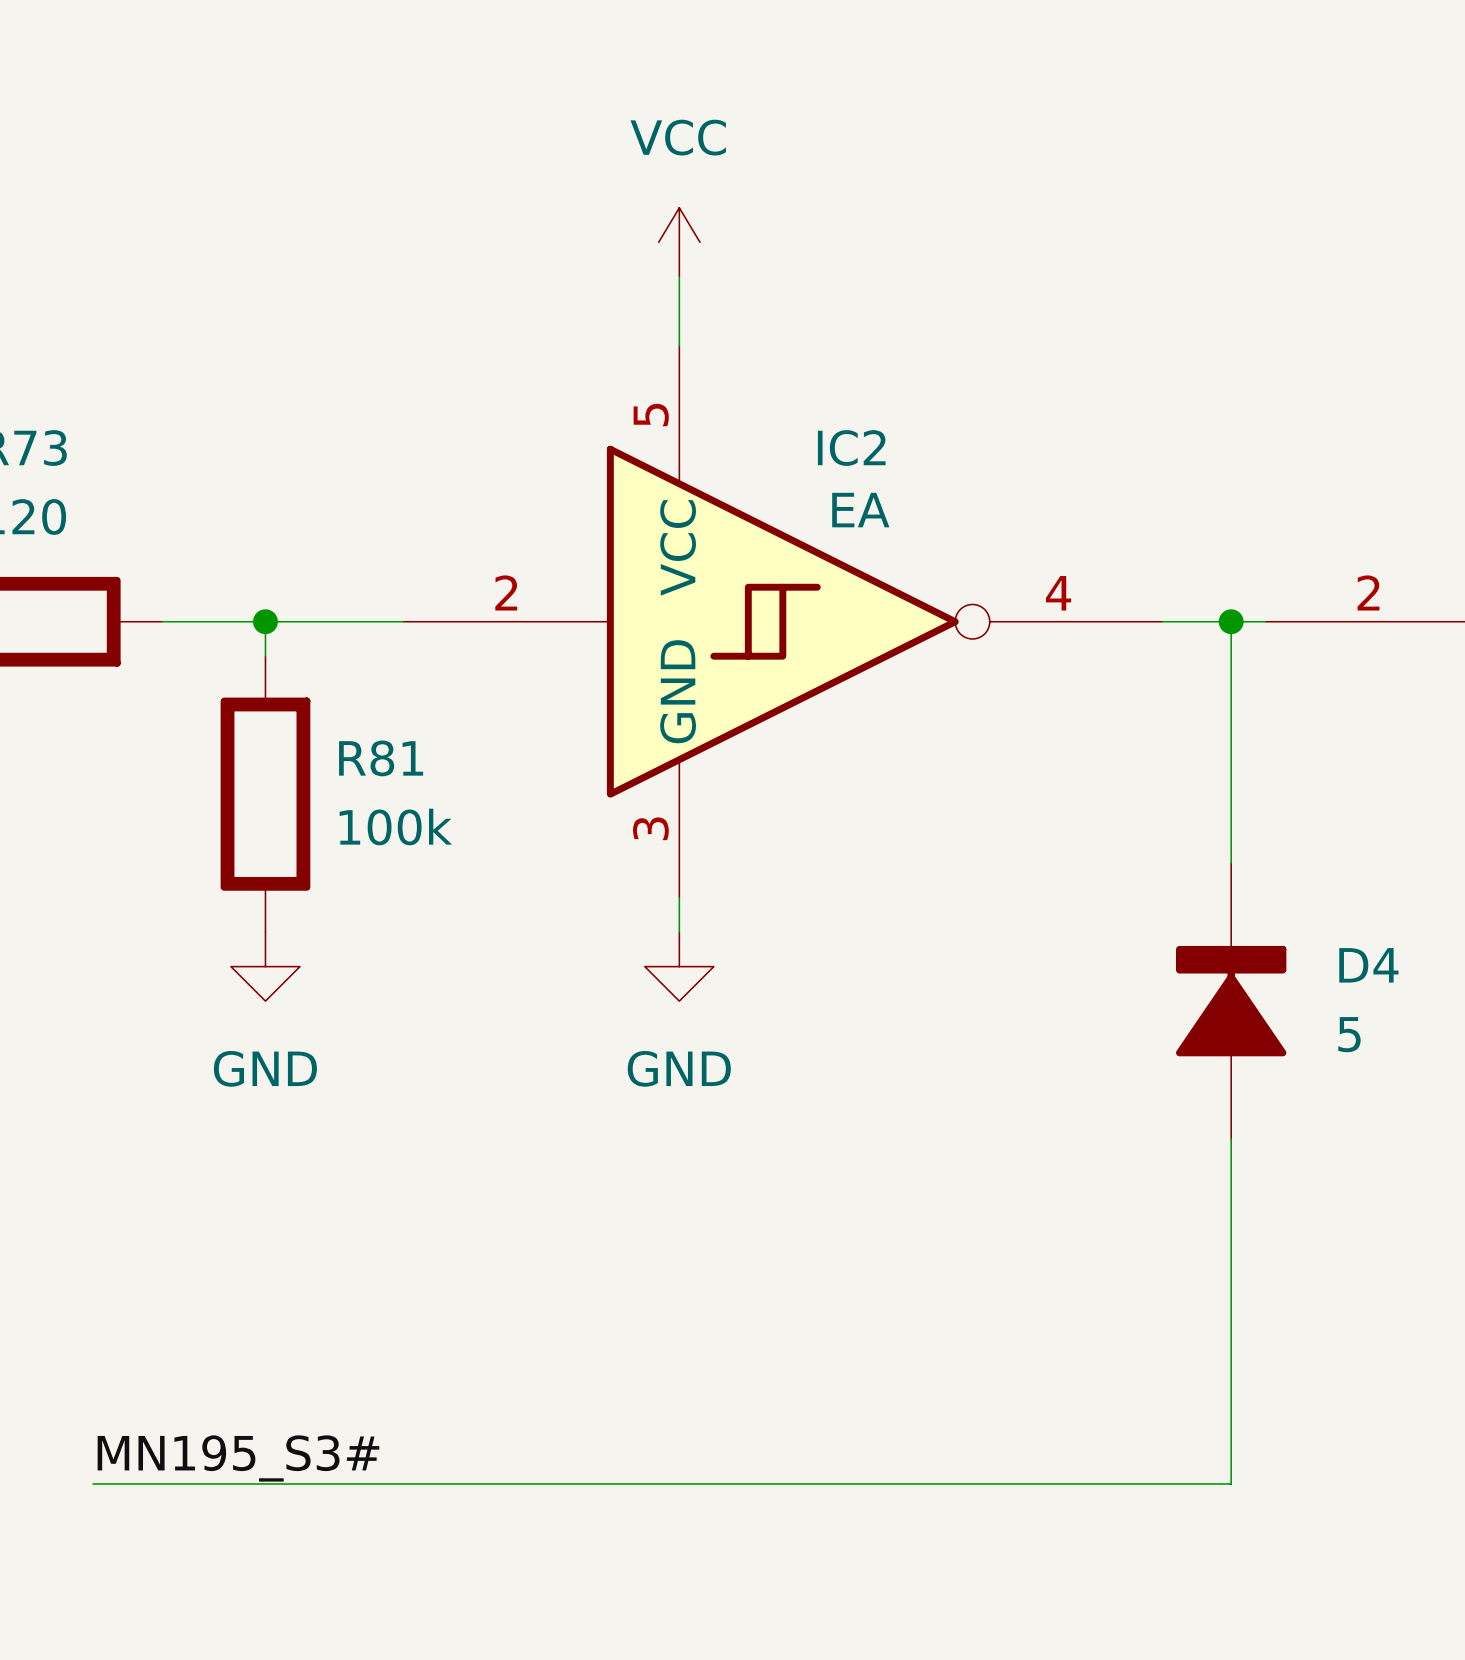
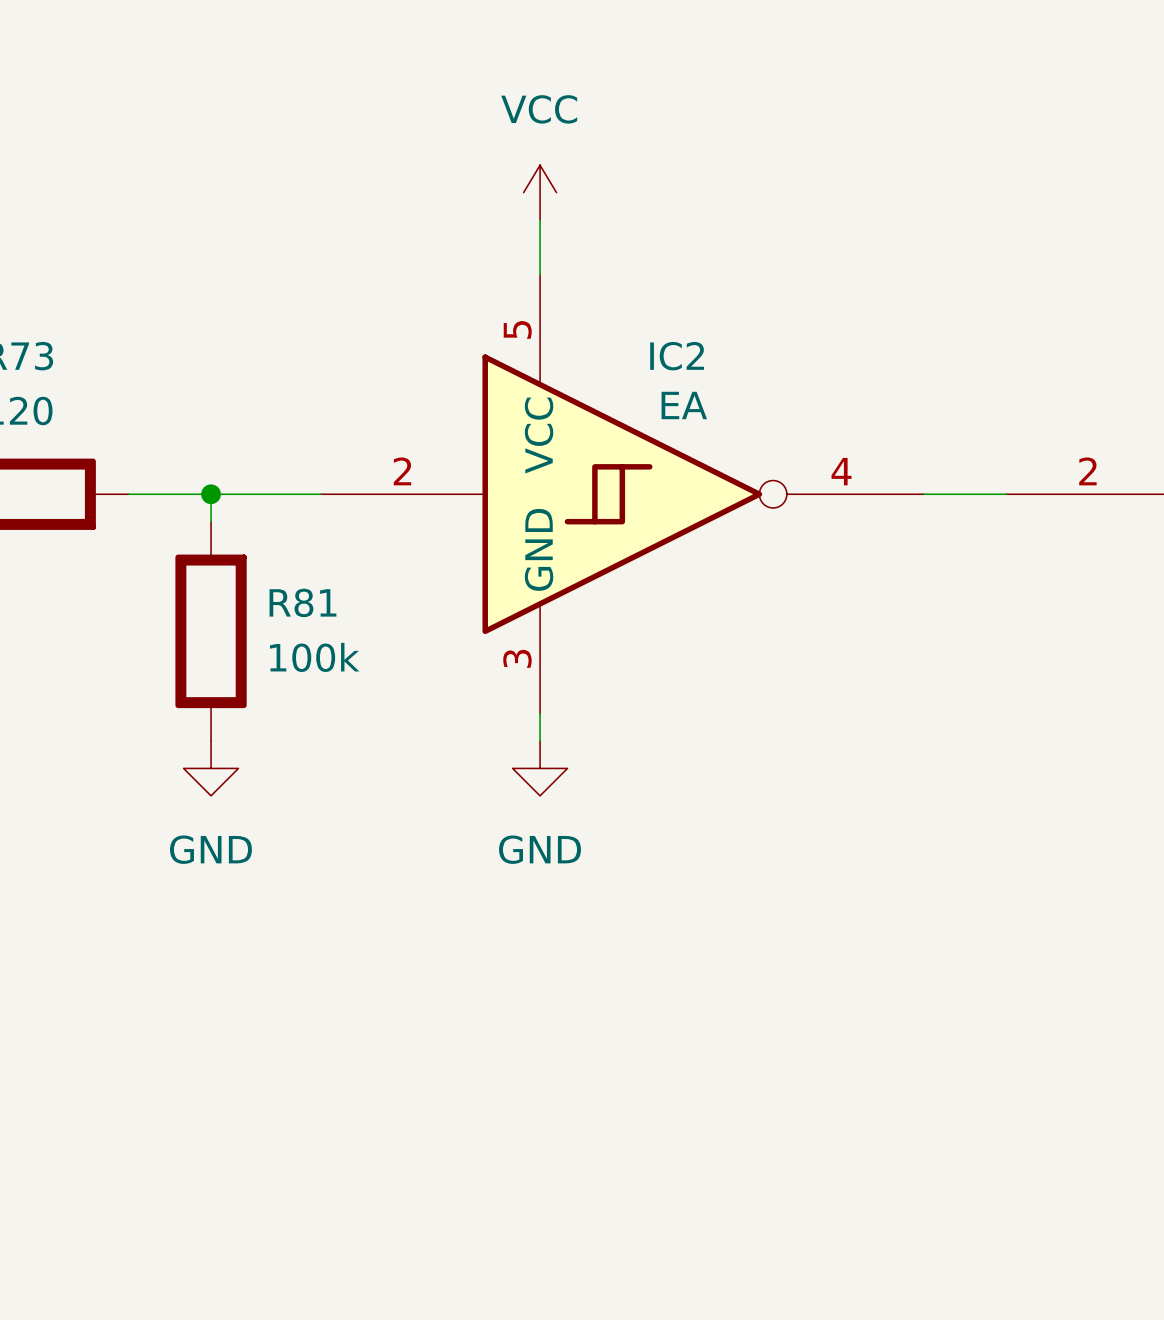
wire: (1231, 621) (1231, 863) -> none
junction: (1231, 621) -> none
D4: 5 (1231, 1001) -> none
wire: (1231, 1139) (1231, 1483) (93, 1483) -> none
label: MN195_S3# (238, 1458) -> none

